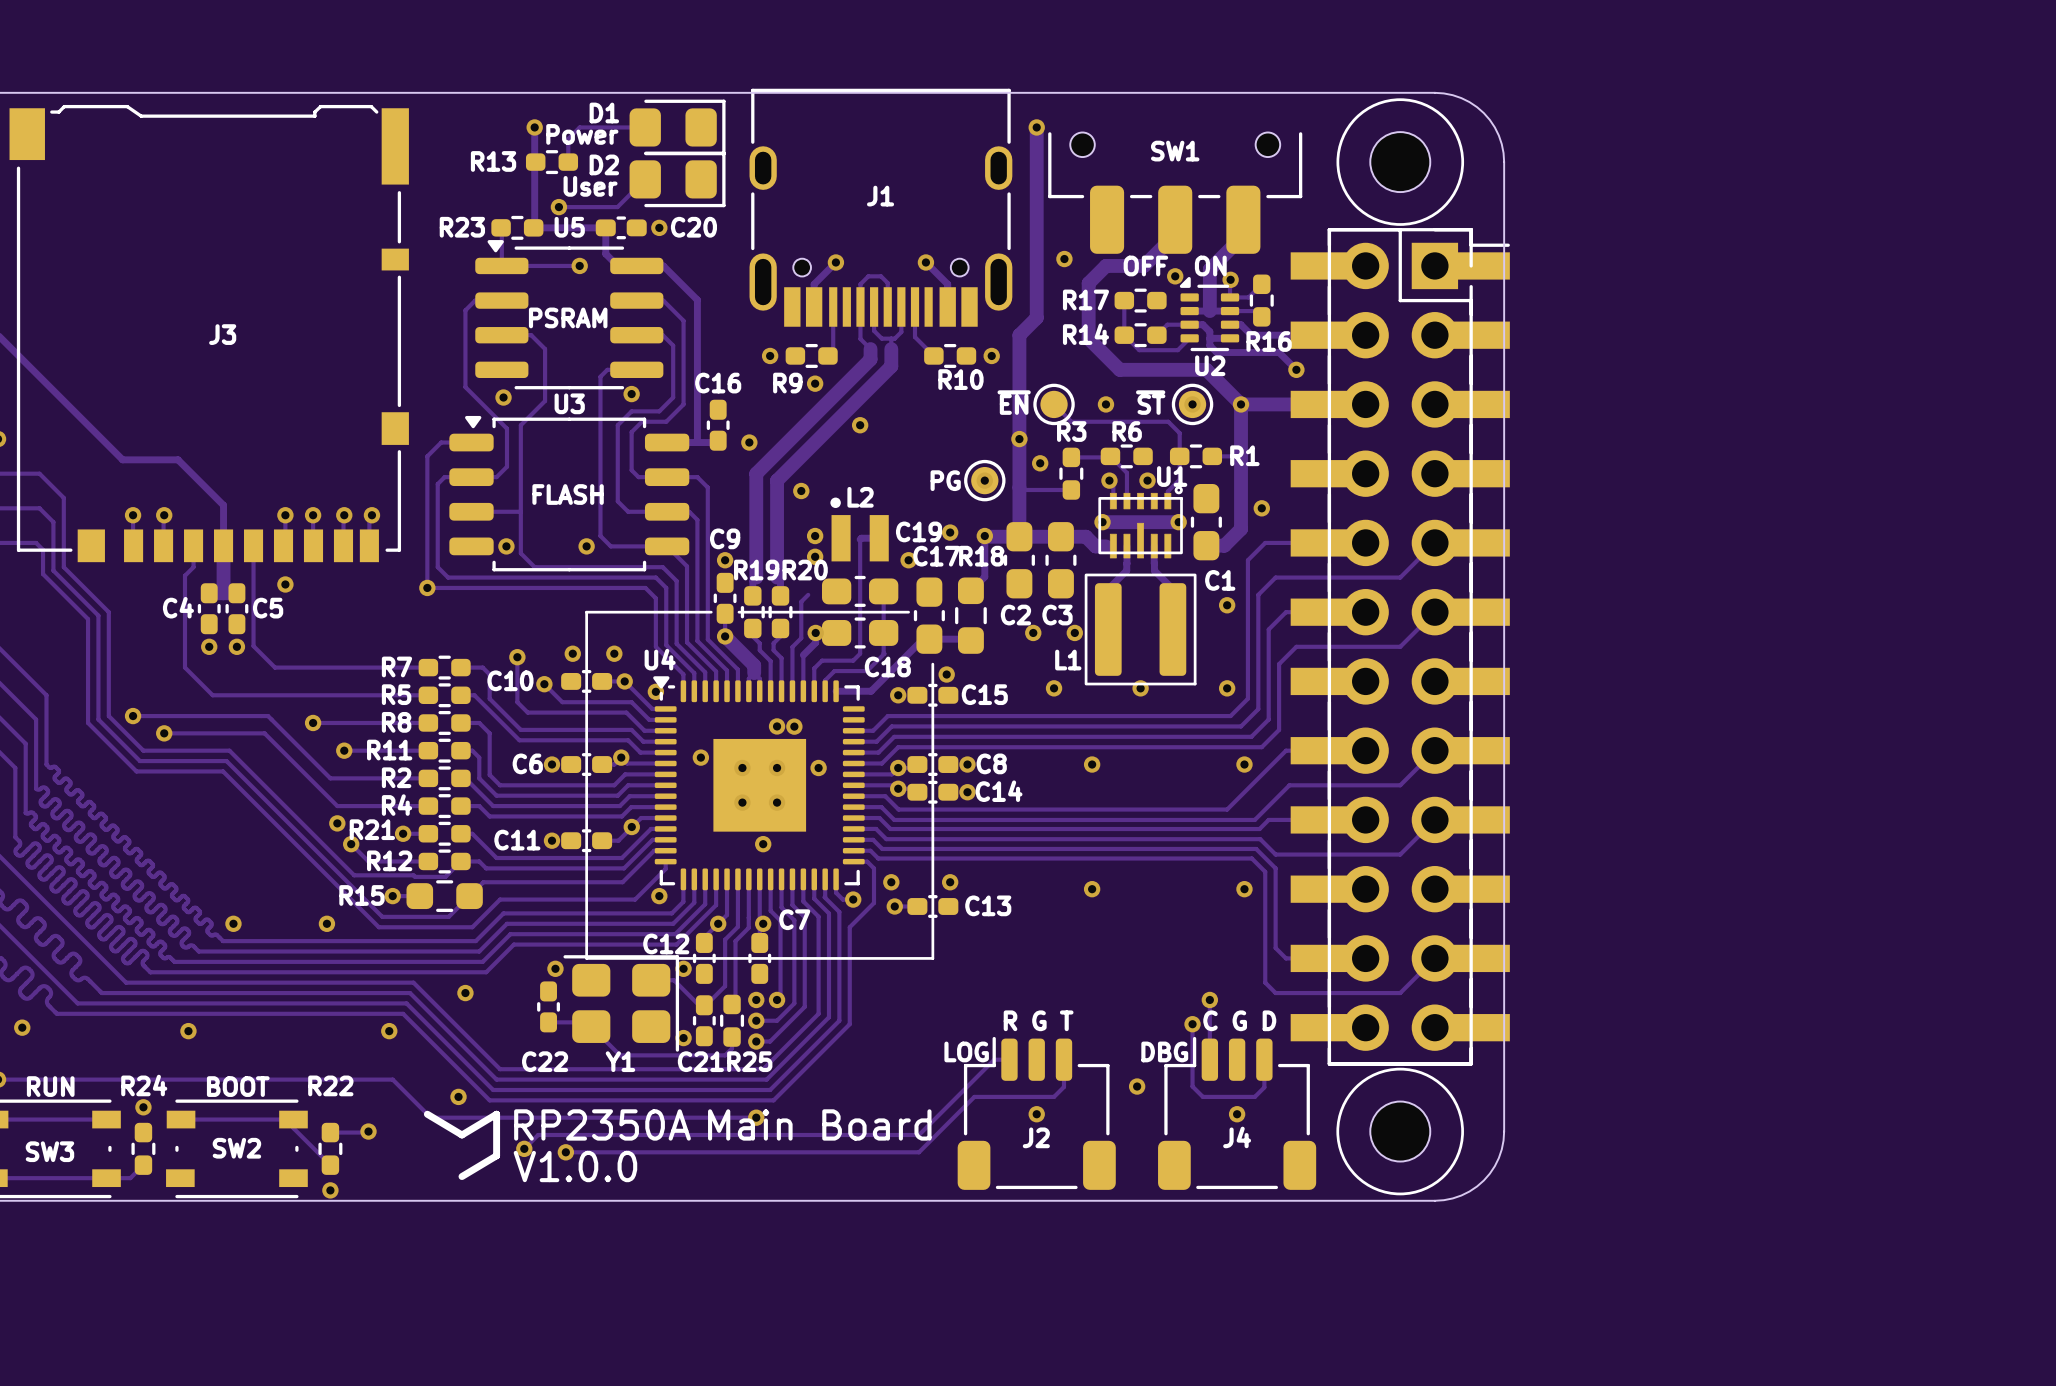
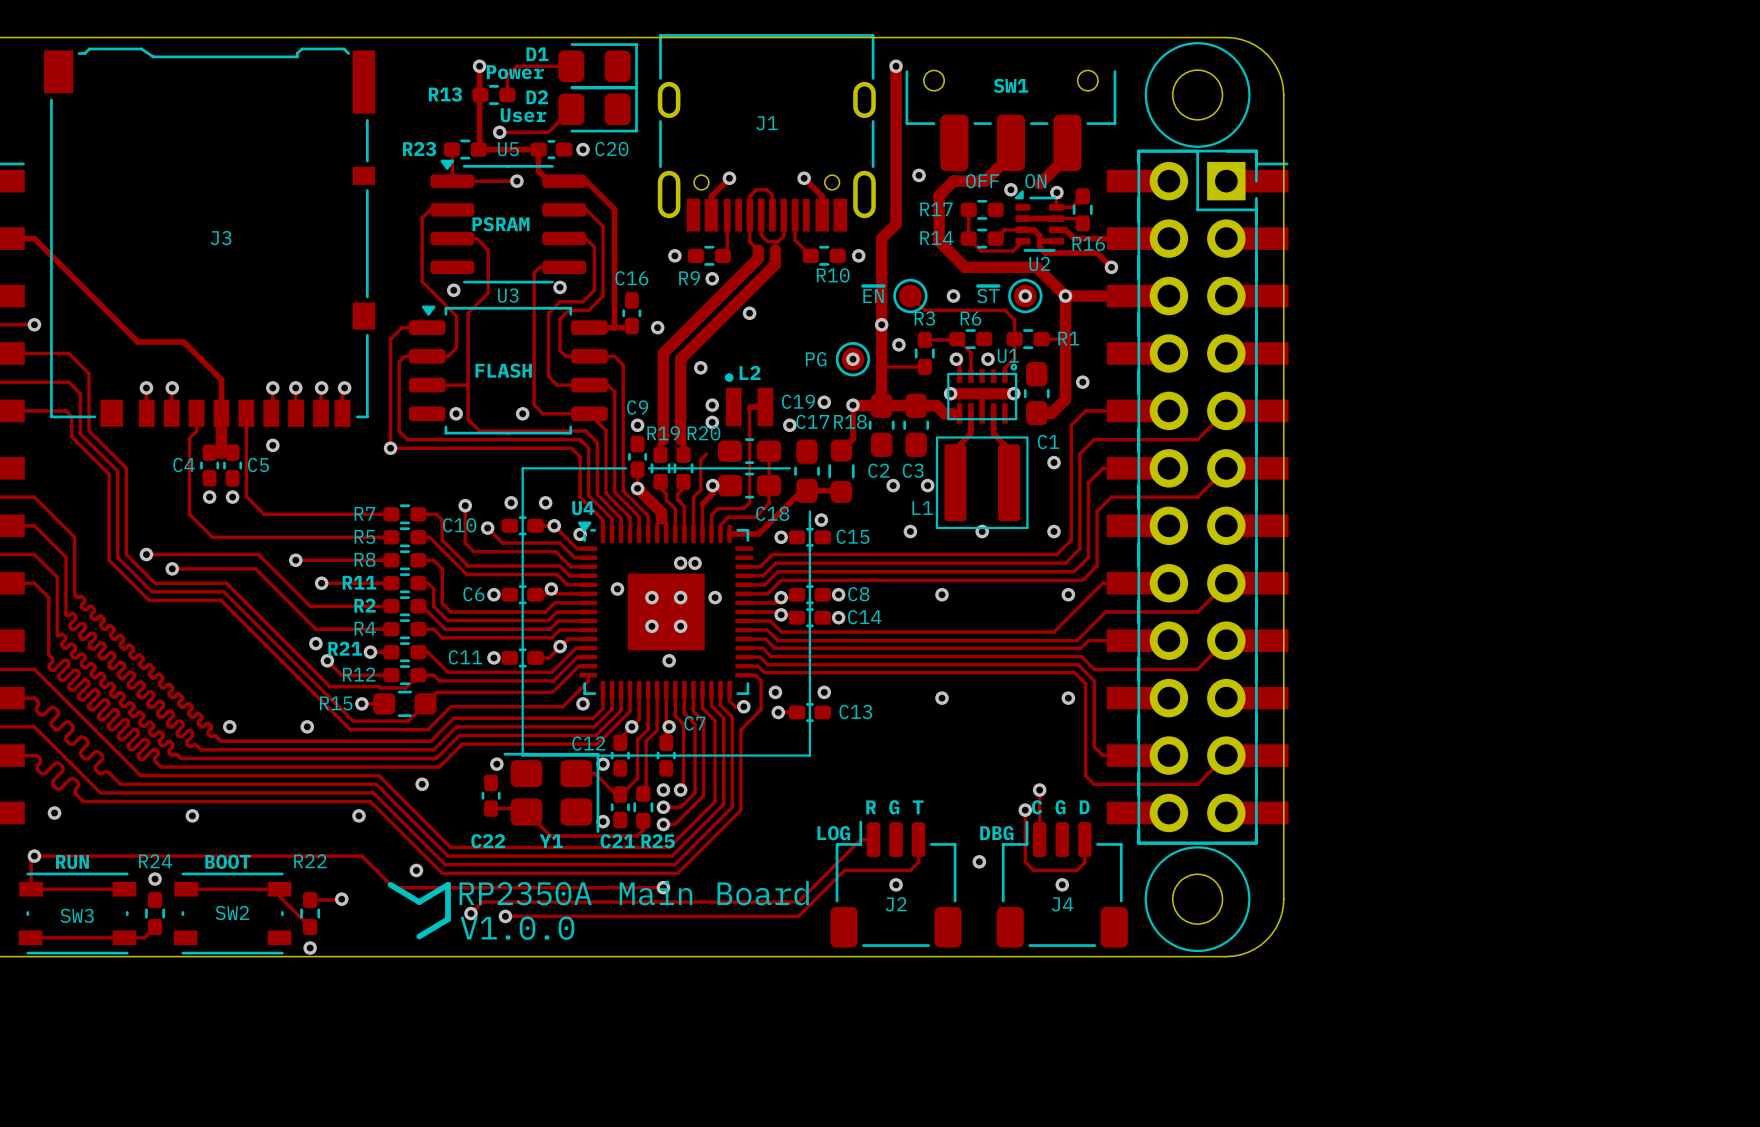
track: (1209, 269) (1209, 311) -> none

